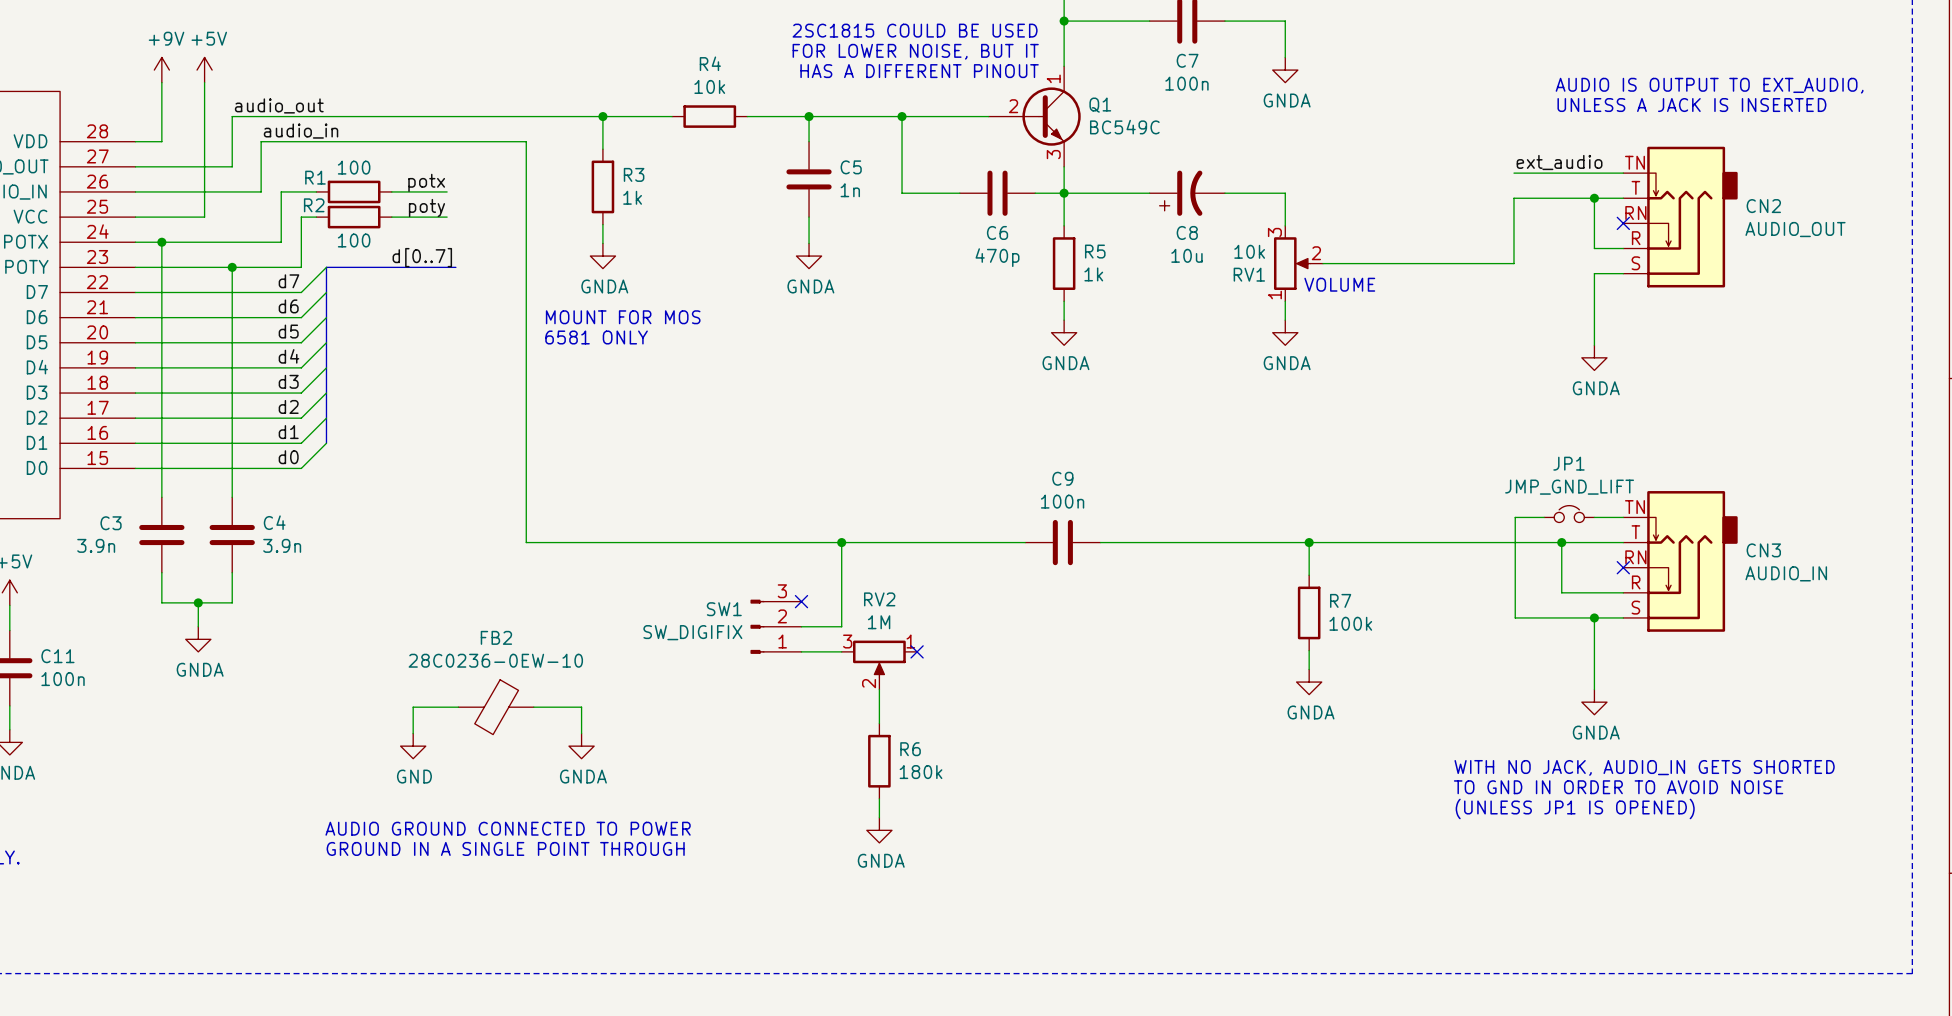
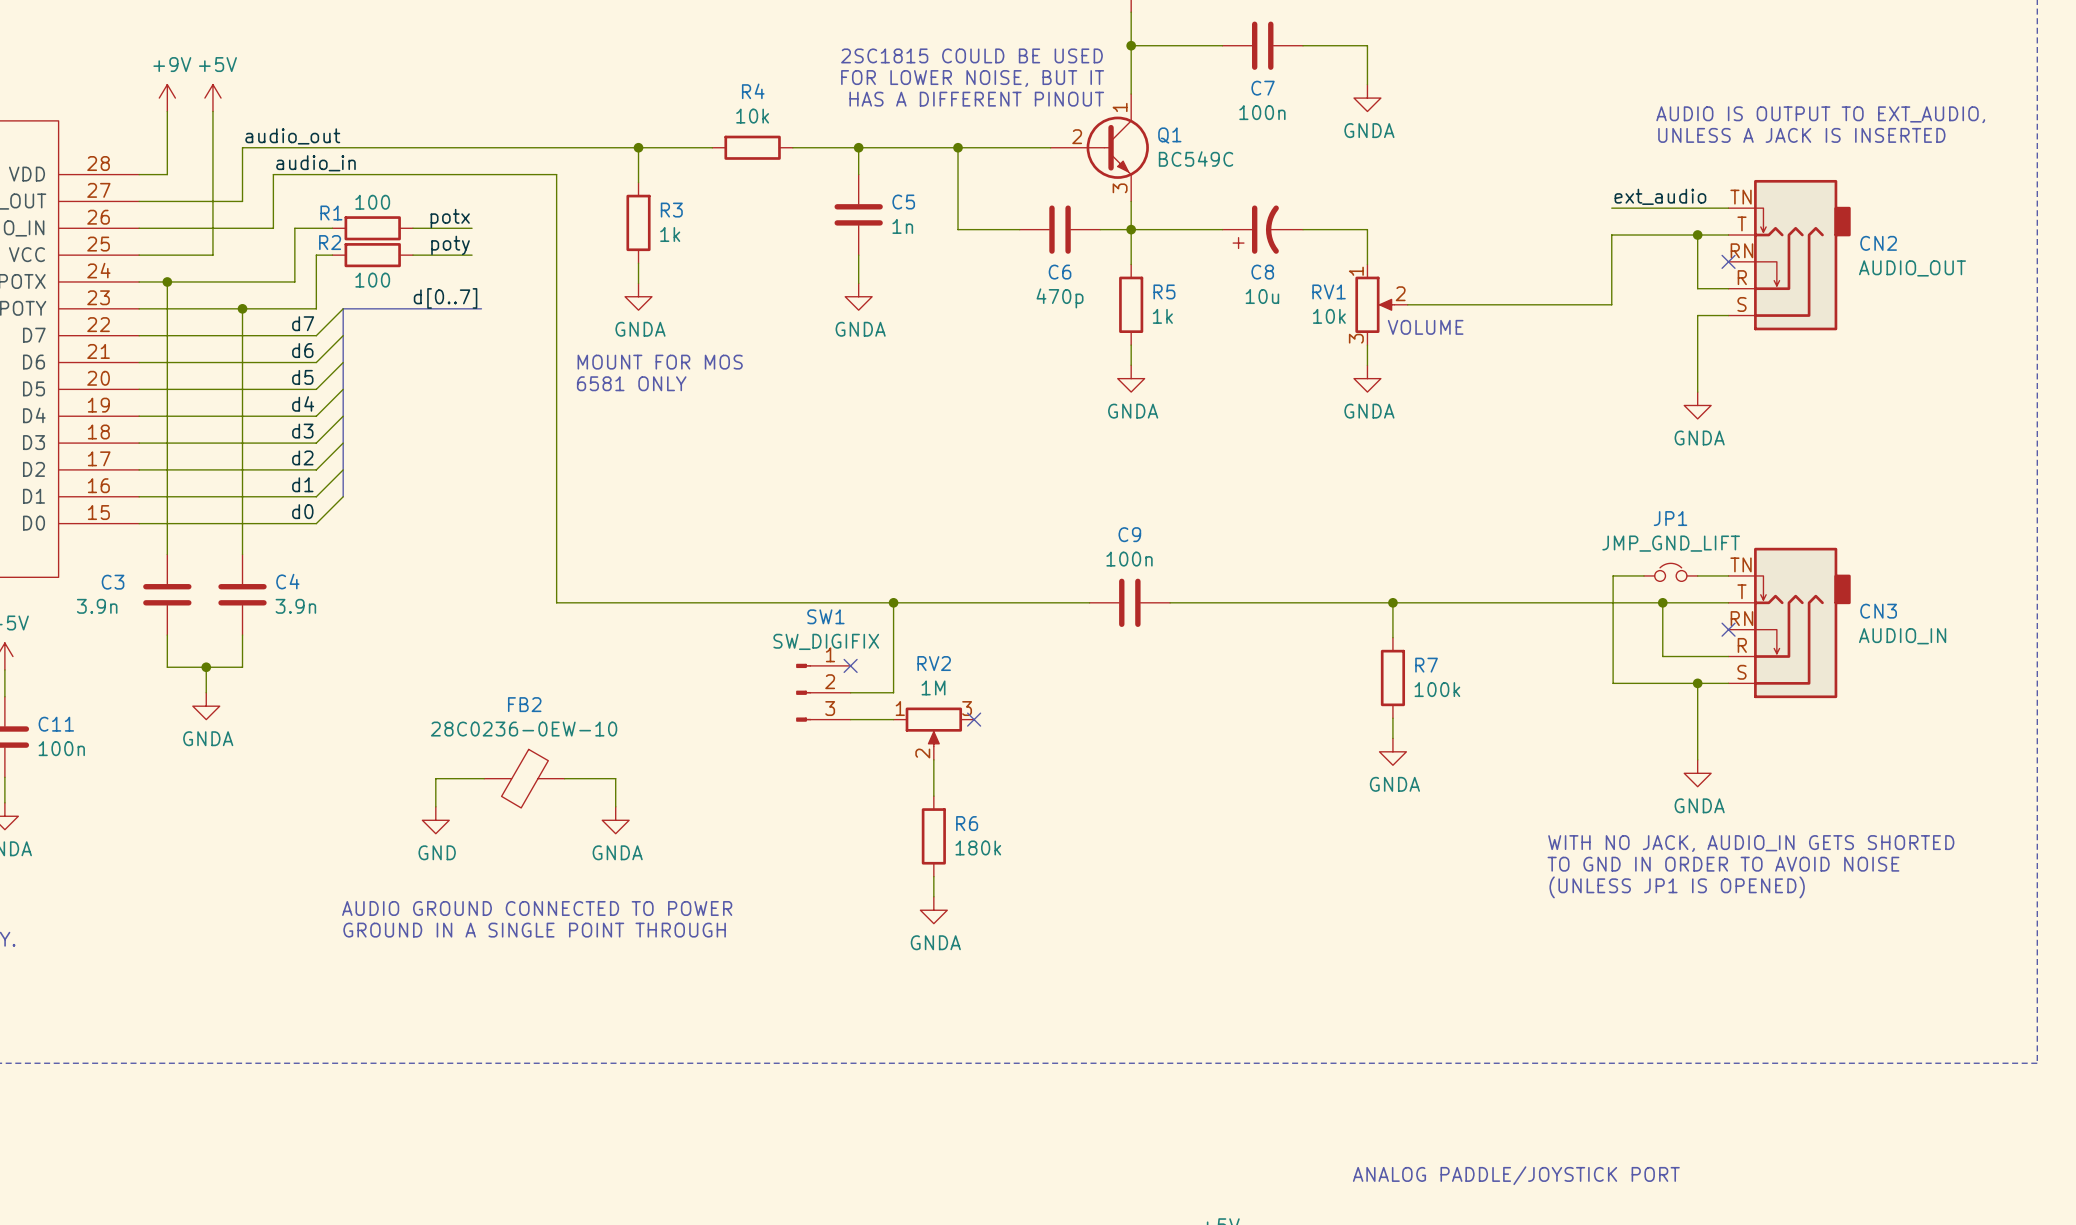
RV1 flip: as is (1292, 263) -> up-down (1374, 304)
SW1 name position: SW1 (724, 609) -> SW1 (825, 616)
SW1 flip: as is (757, 626) -> up-down (803, 692)
SW1 value position: SW_DIGIFIX (692, 632) -> SW_DIGIFIX (826, 641)
RV2 flip: as is (879, 658) -> left-right (933, 726)

